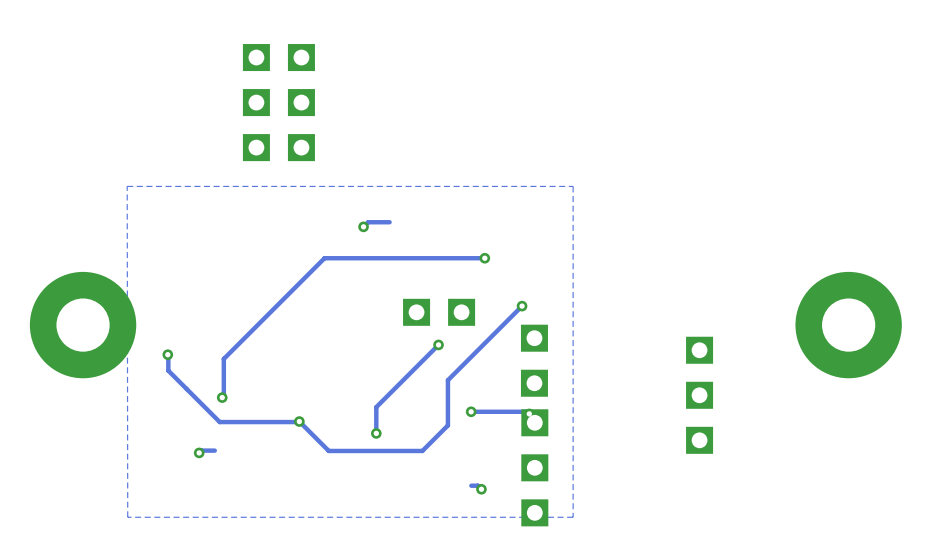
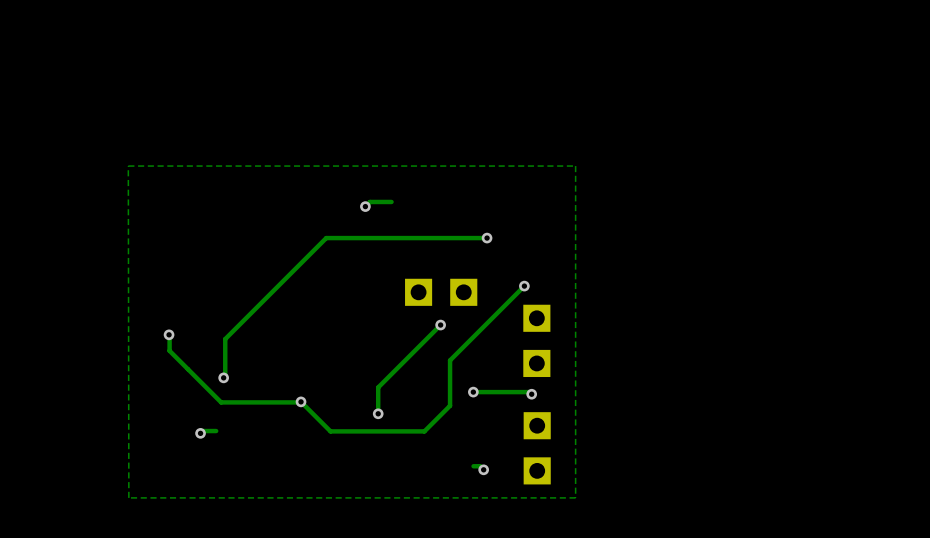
part: (278, 102) -> none
part: (83, 325) -> none
part: (848, 325) -> none
part: (699, 395) -> none
part footprint: [521, 409, 549, 527] -> [523, 412, 551, 485]

